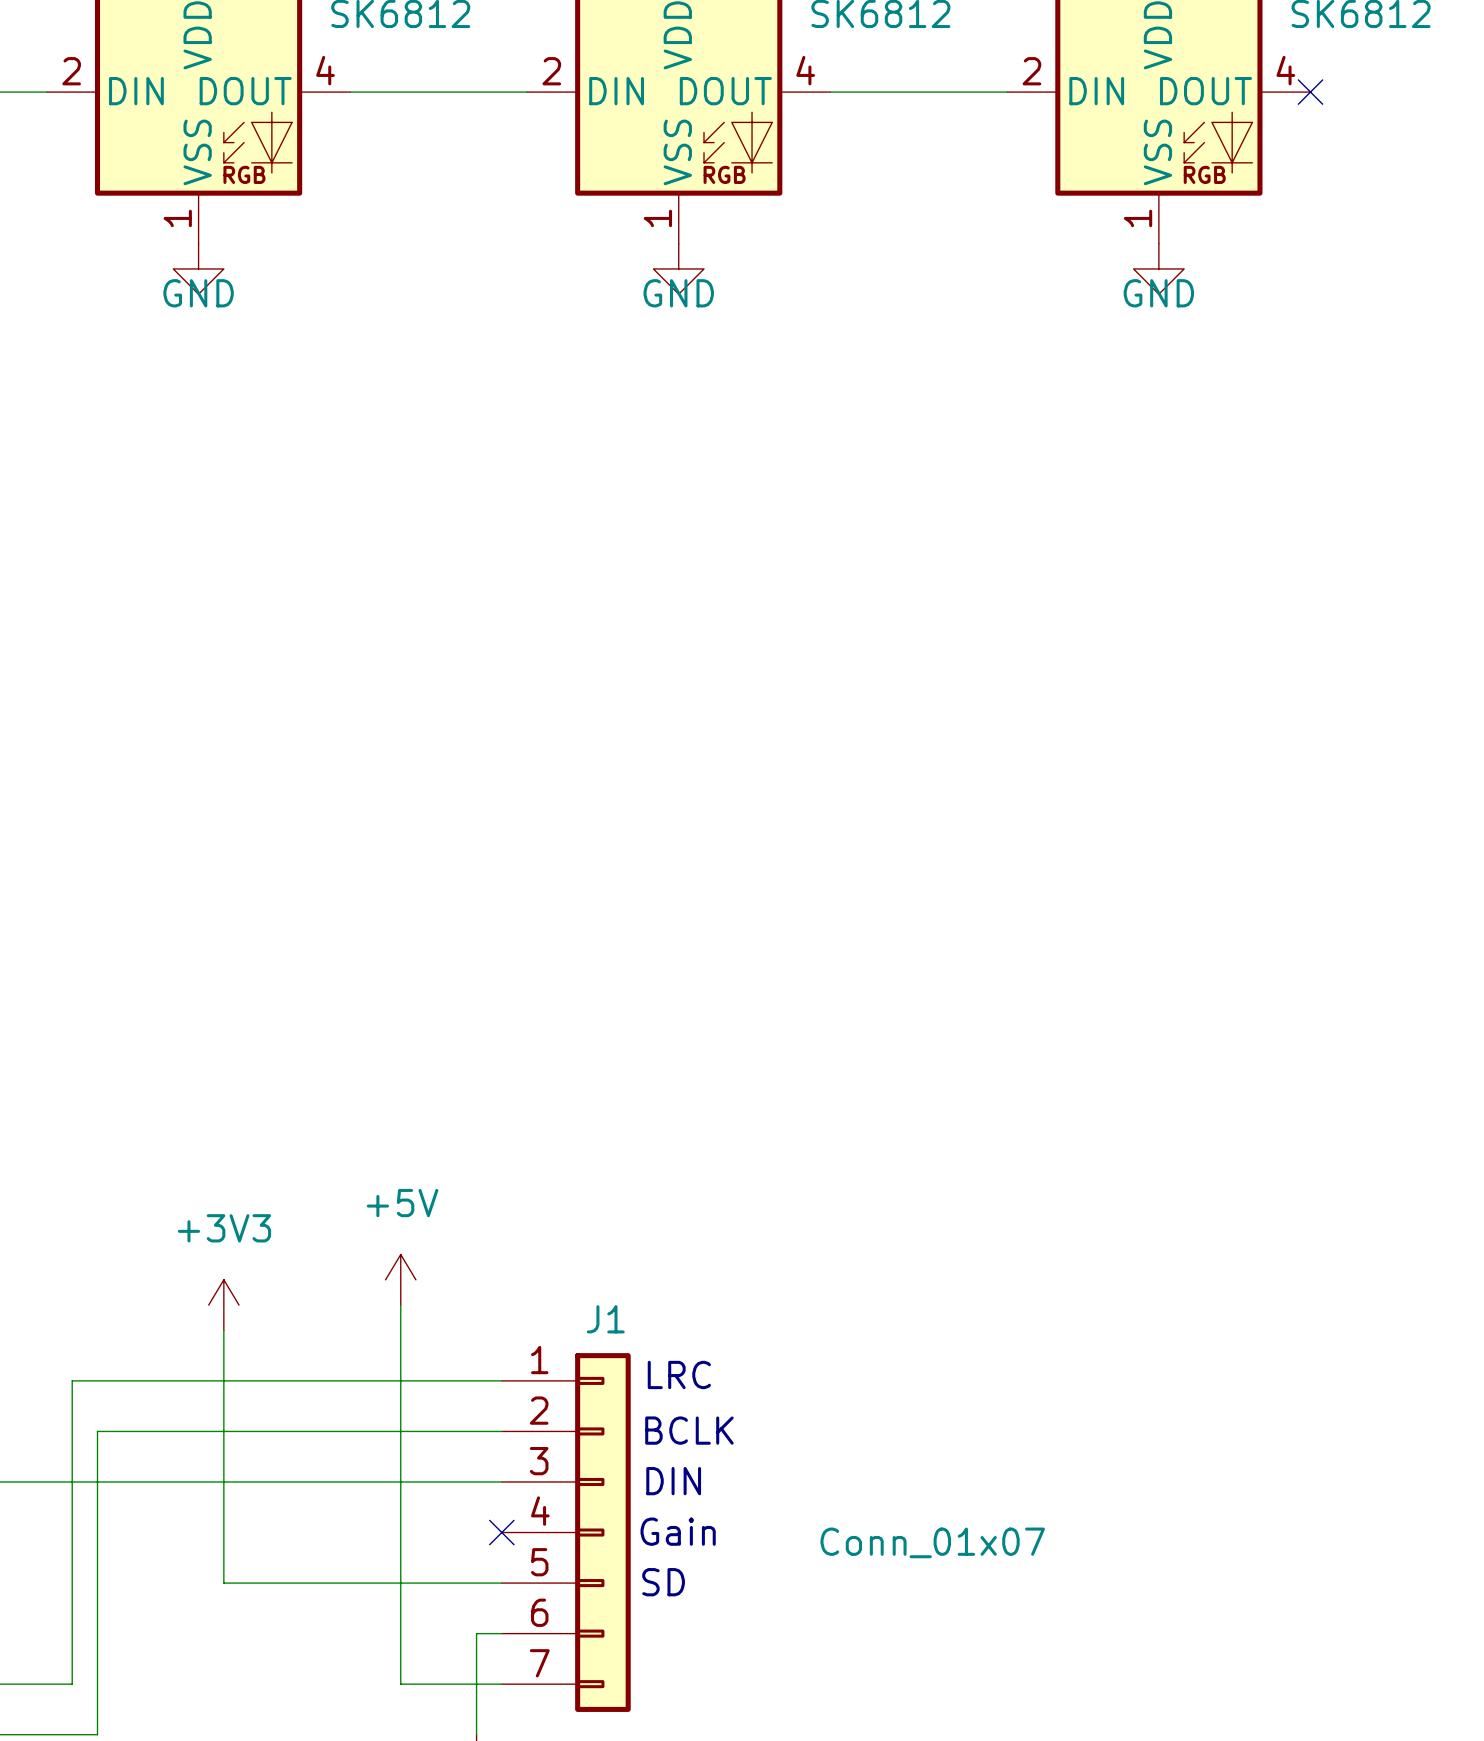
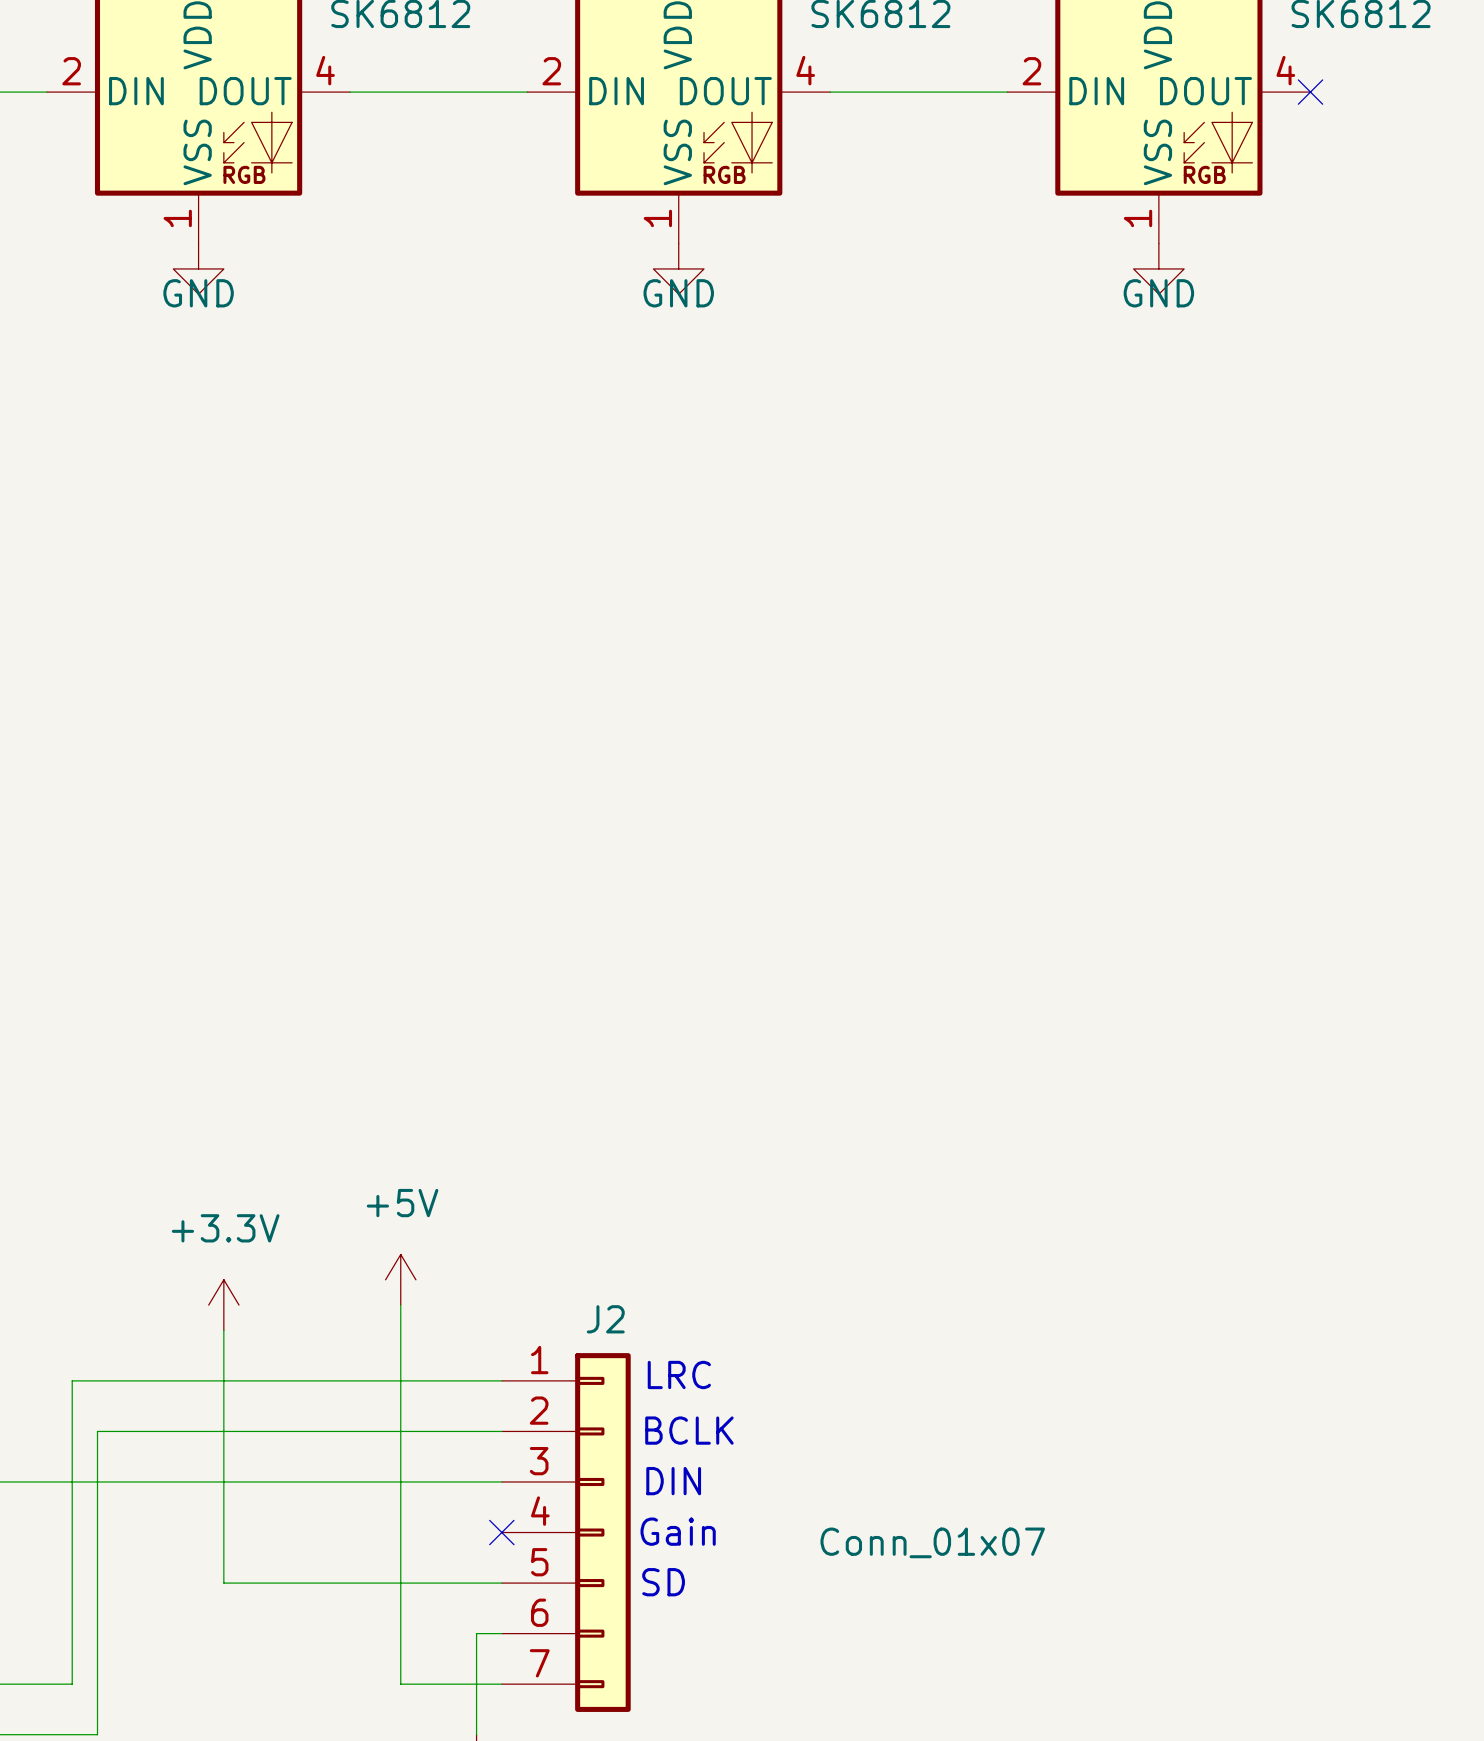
power symbol: +3V3 (223, 1305) -> +3.3V (223, 1305)
J1 name: J1 (605, 1319) -> J2 (605, 1319)

